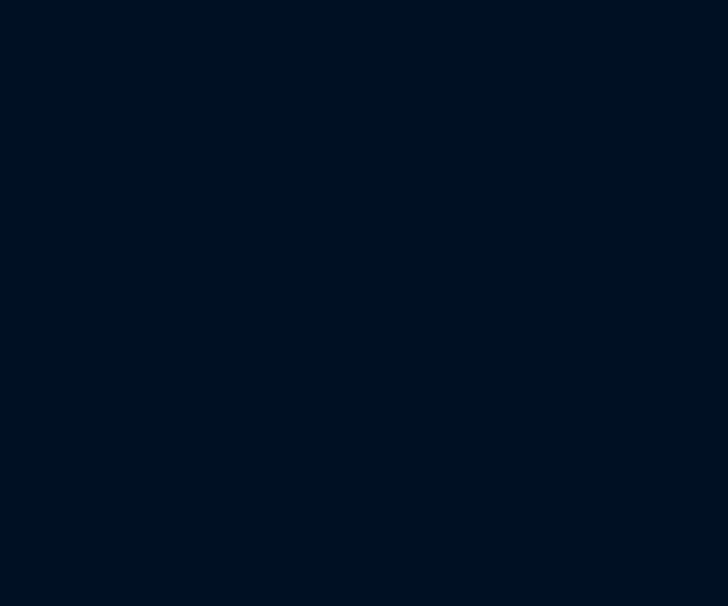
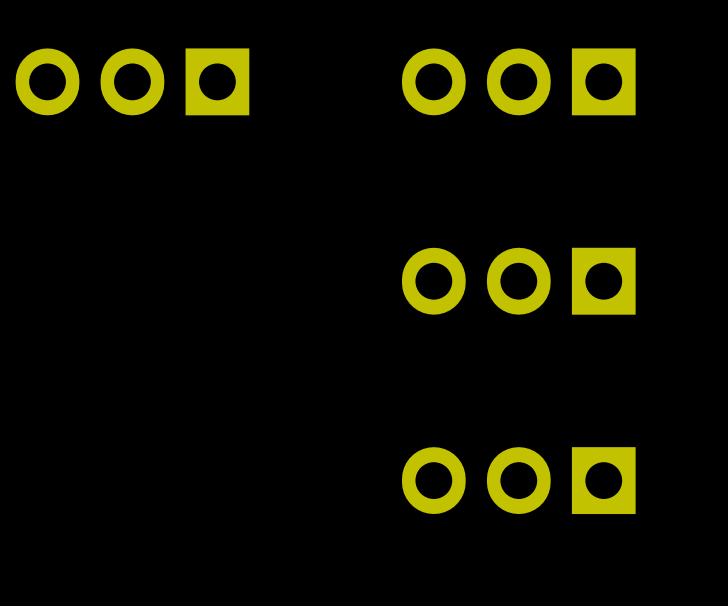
part: none -> (132, 81)
part: none -> (518, 81)
part: none -> (518, 281)
part: none -> (518, 480)

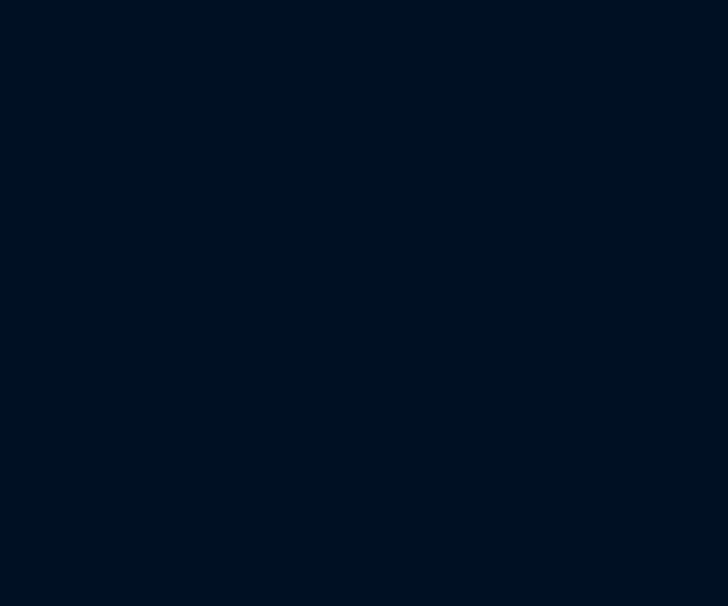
part: (132, 81) -> none
part: (518, 81) -> none
part: (518, 281) -> none
part: (518, 480) -> none

